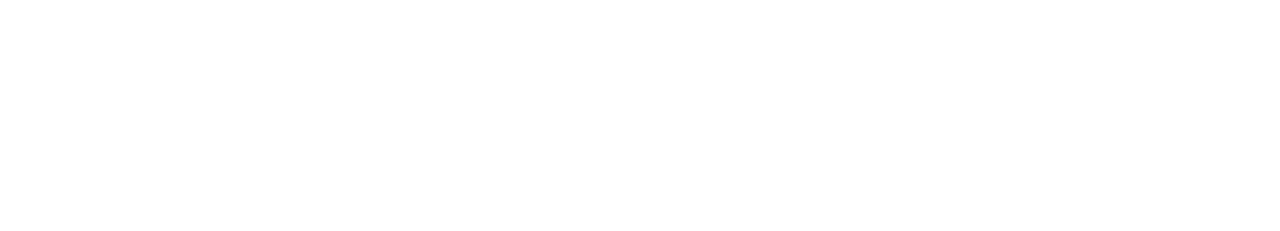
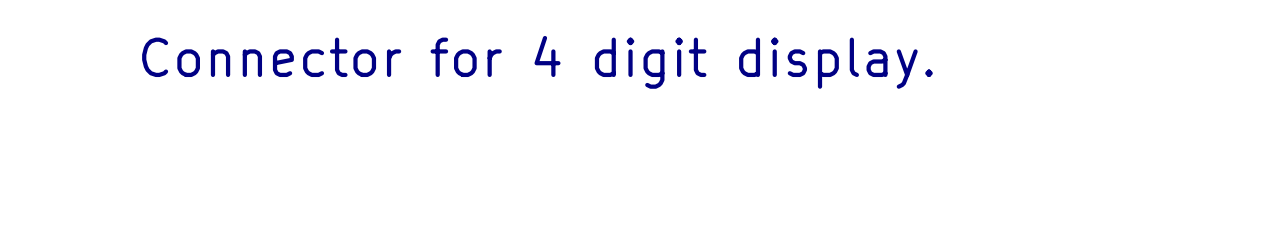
text: none -> Connector for 4 digit display. (537, 62)

